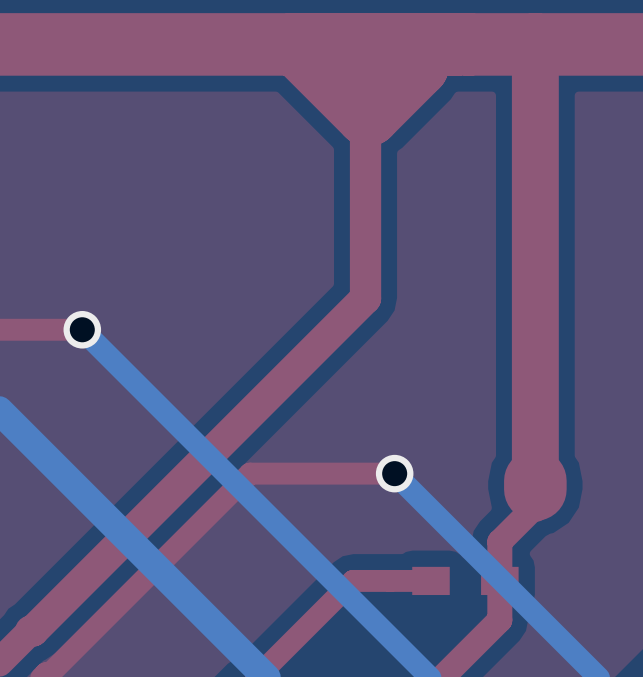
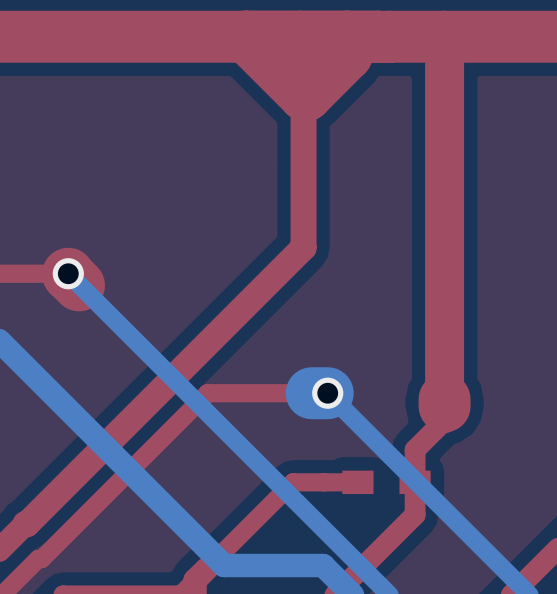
top track: none -> (68, 273) (79, 285)
bottom track: none -> (327, 393) (311, 393)

